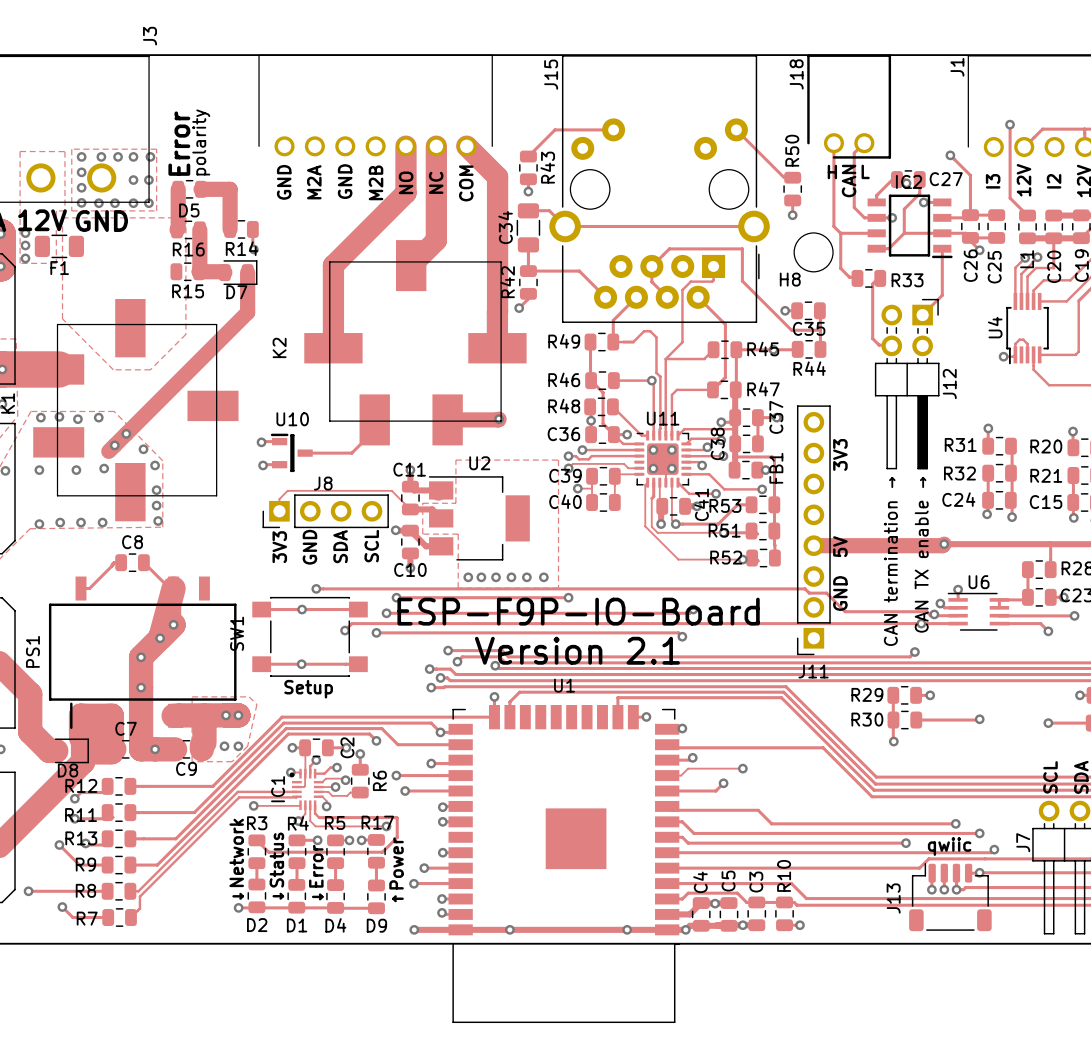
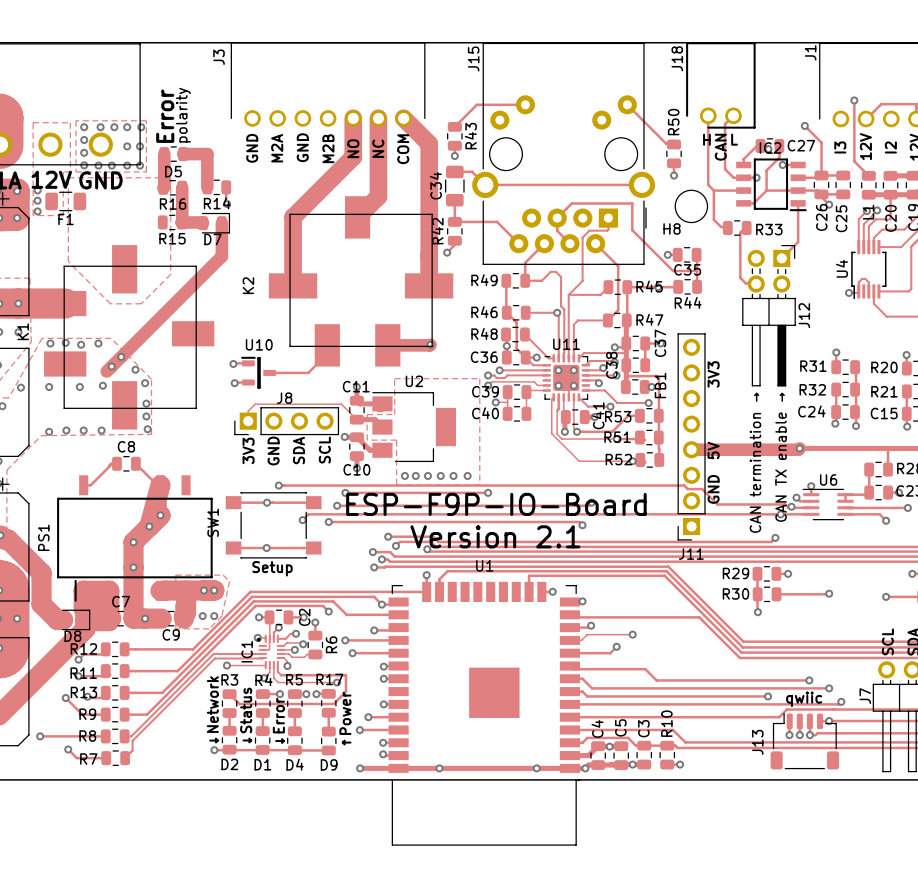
J3 name position: J3 (149, 36) -> J3 (219, 57)

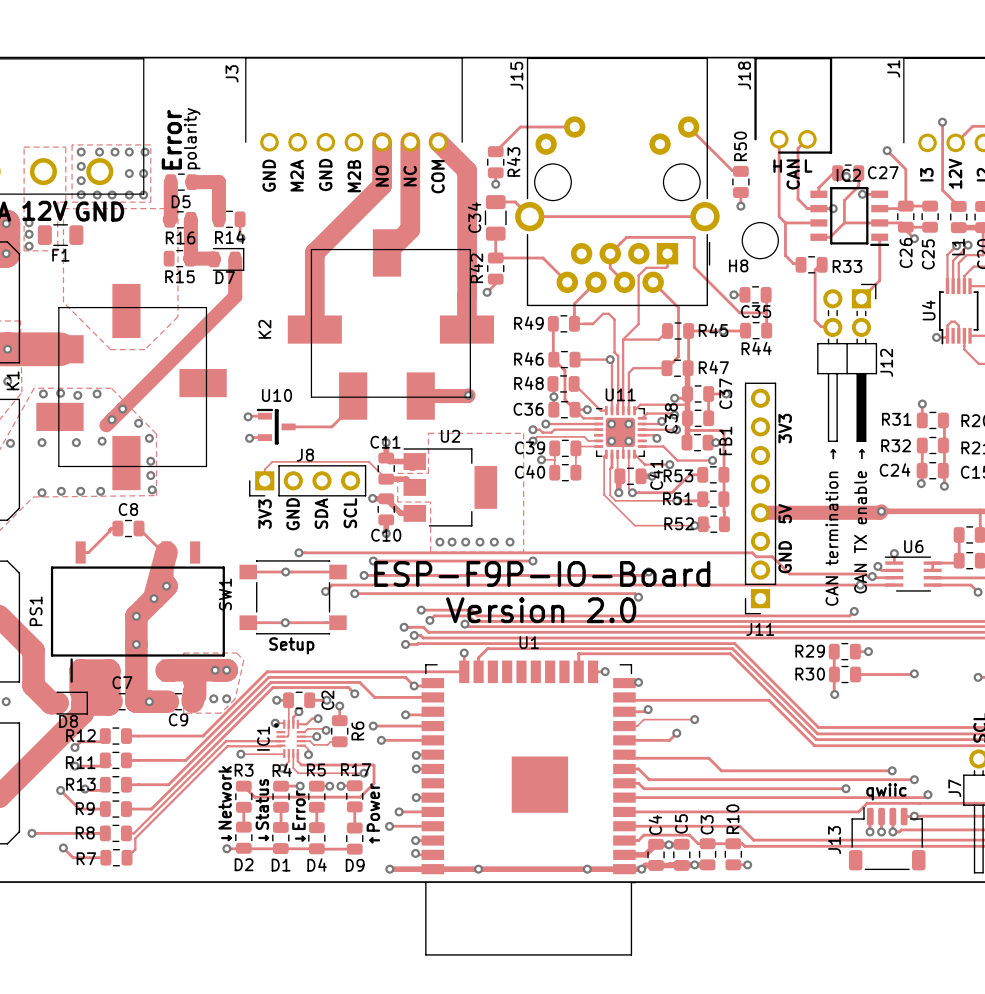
text: Version 2.1 (495, 536) -> Version 2.0 (541, 610)

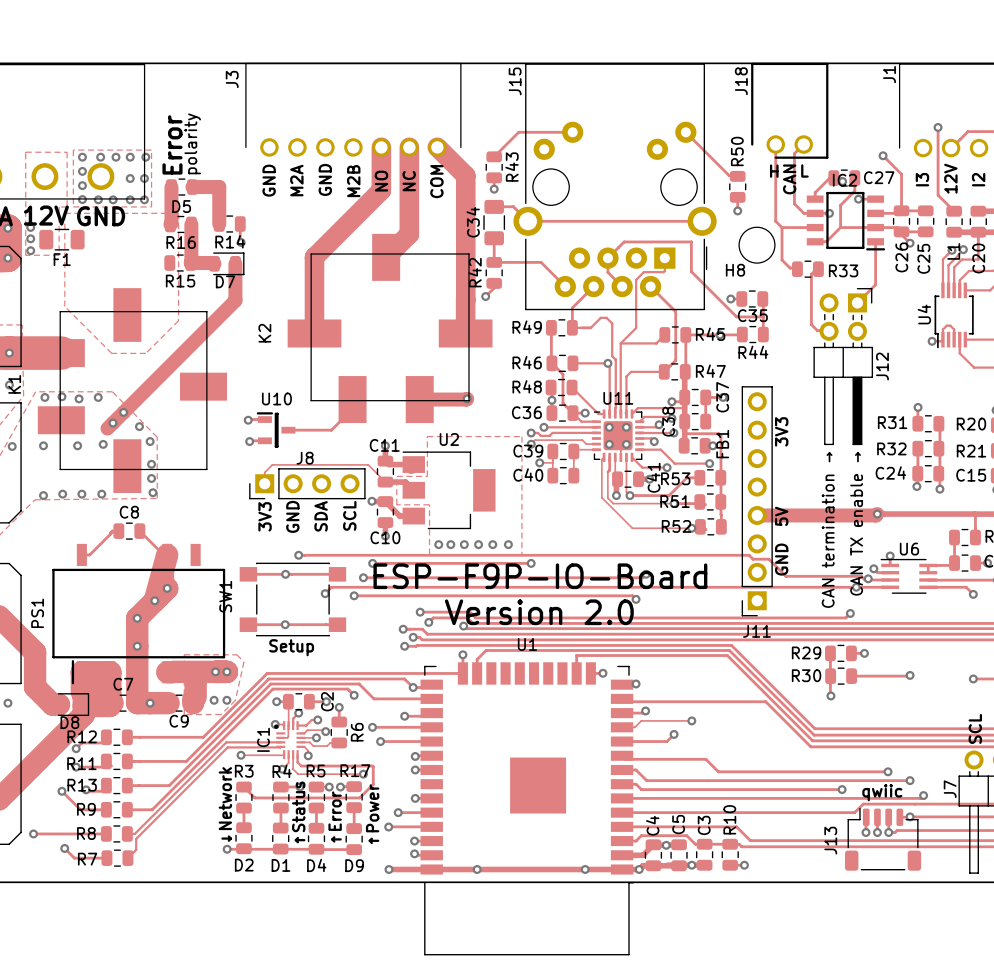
text: ↓Status (262, 810) -> none
text: ↓Error (298, 816) -> ↑Status (298, 812)
text: none -> ↑Error (335, 817)

